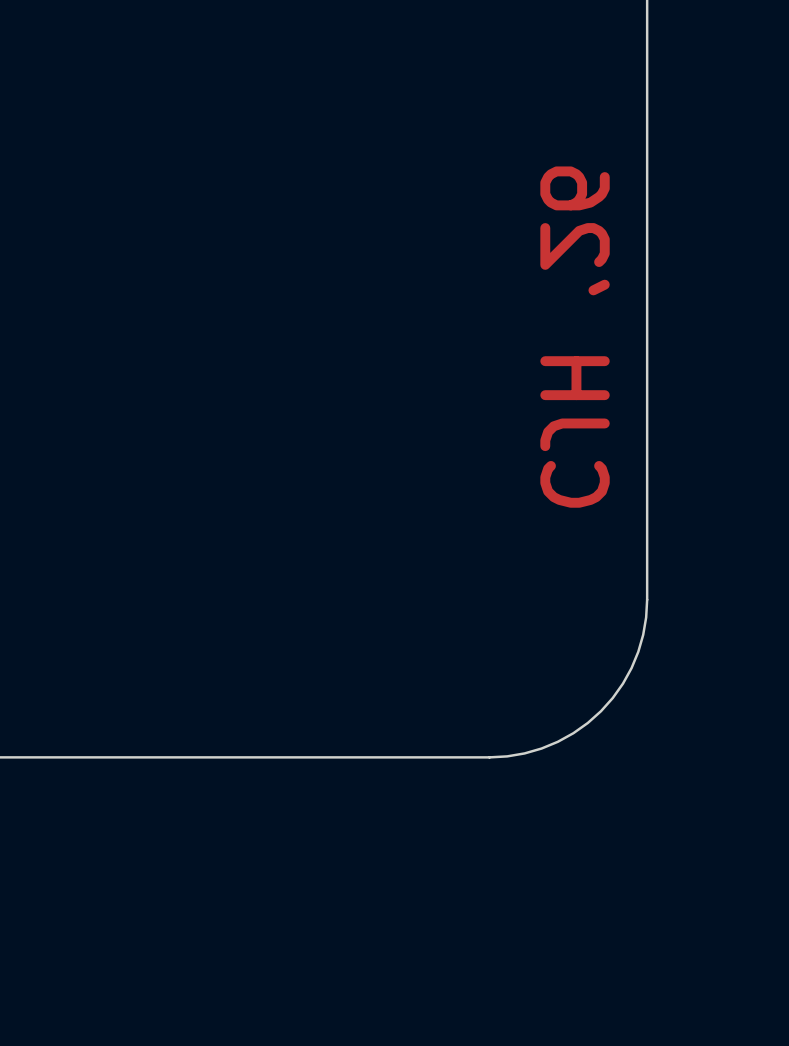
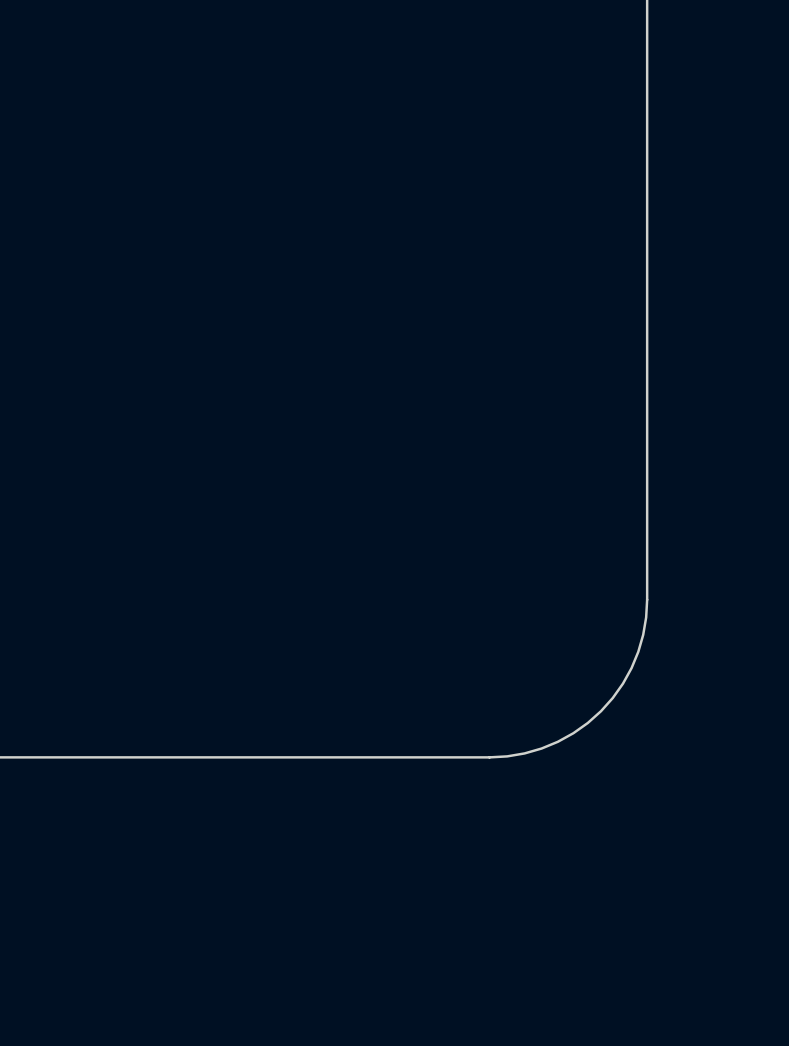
drawing: [540, 166, 610, 508] -> none

